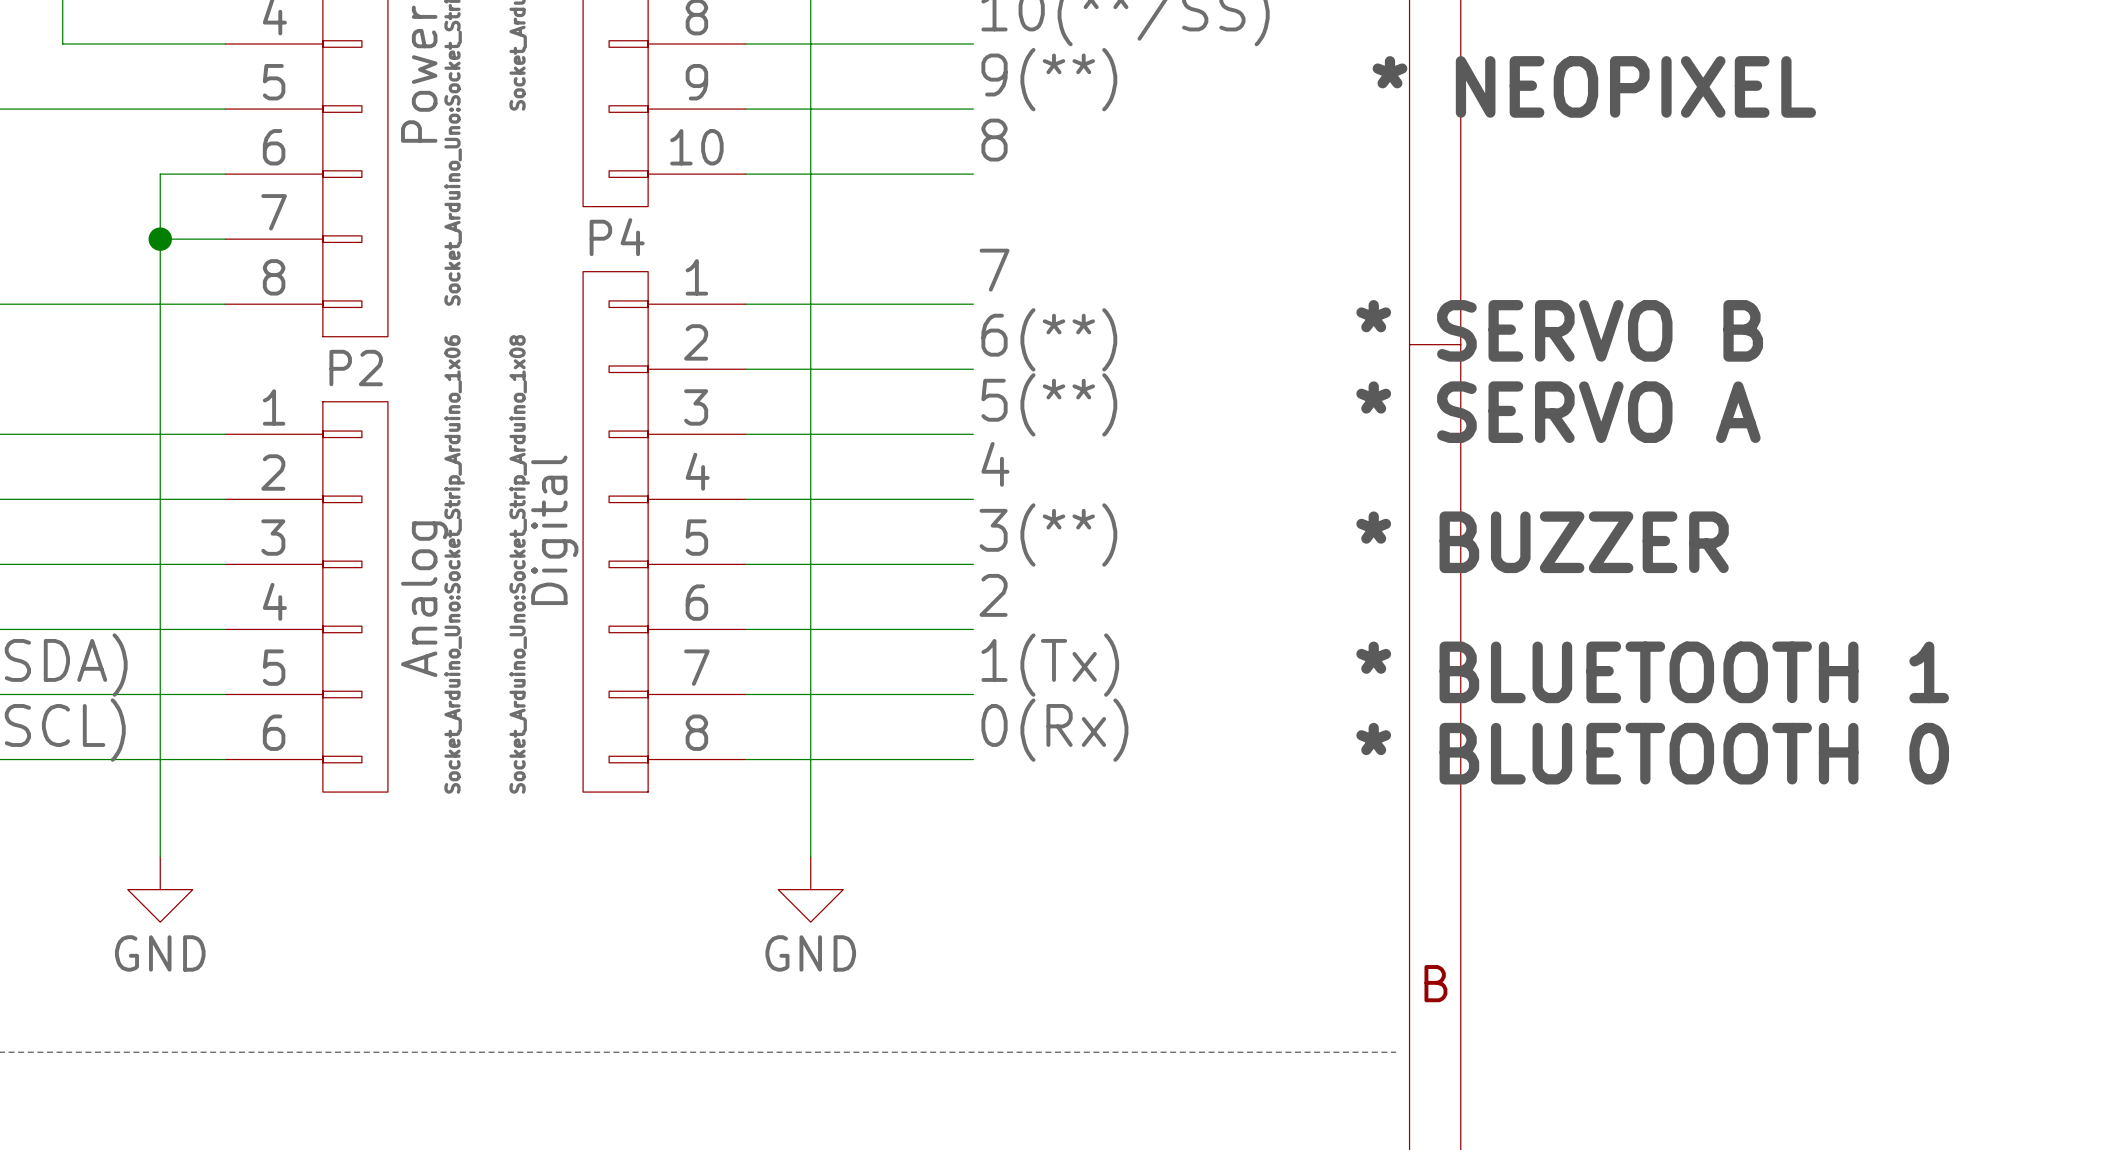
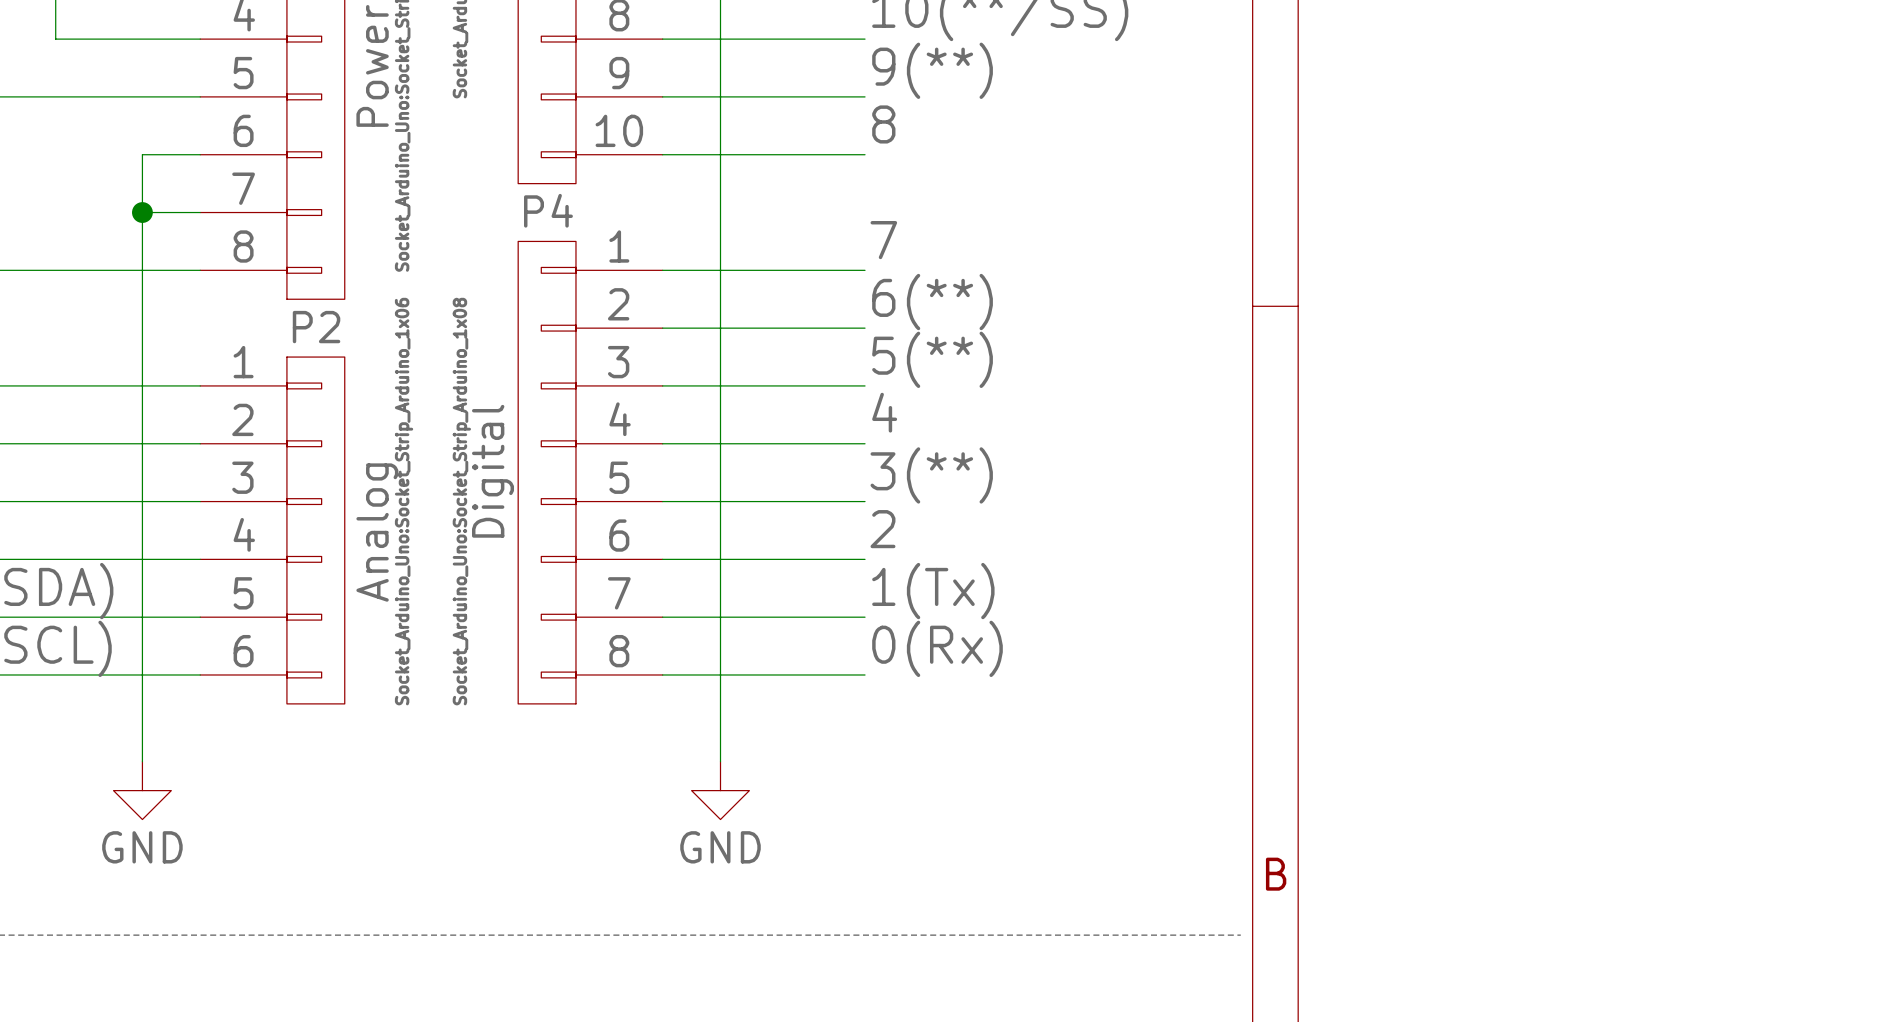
text: * NEOPIXEL (1594, 86) -> none
text: * SERVO B (1559, 330) -> none
text: * SERVO A (1558, 412) -> none
text: * BUZZER (1542, 542) -> none
text: * BLUETOOTH 1 (1652, 672) -> none
text: * BLUETOOTH 0 (1652, 753) -> none

